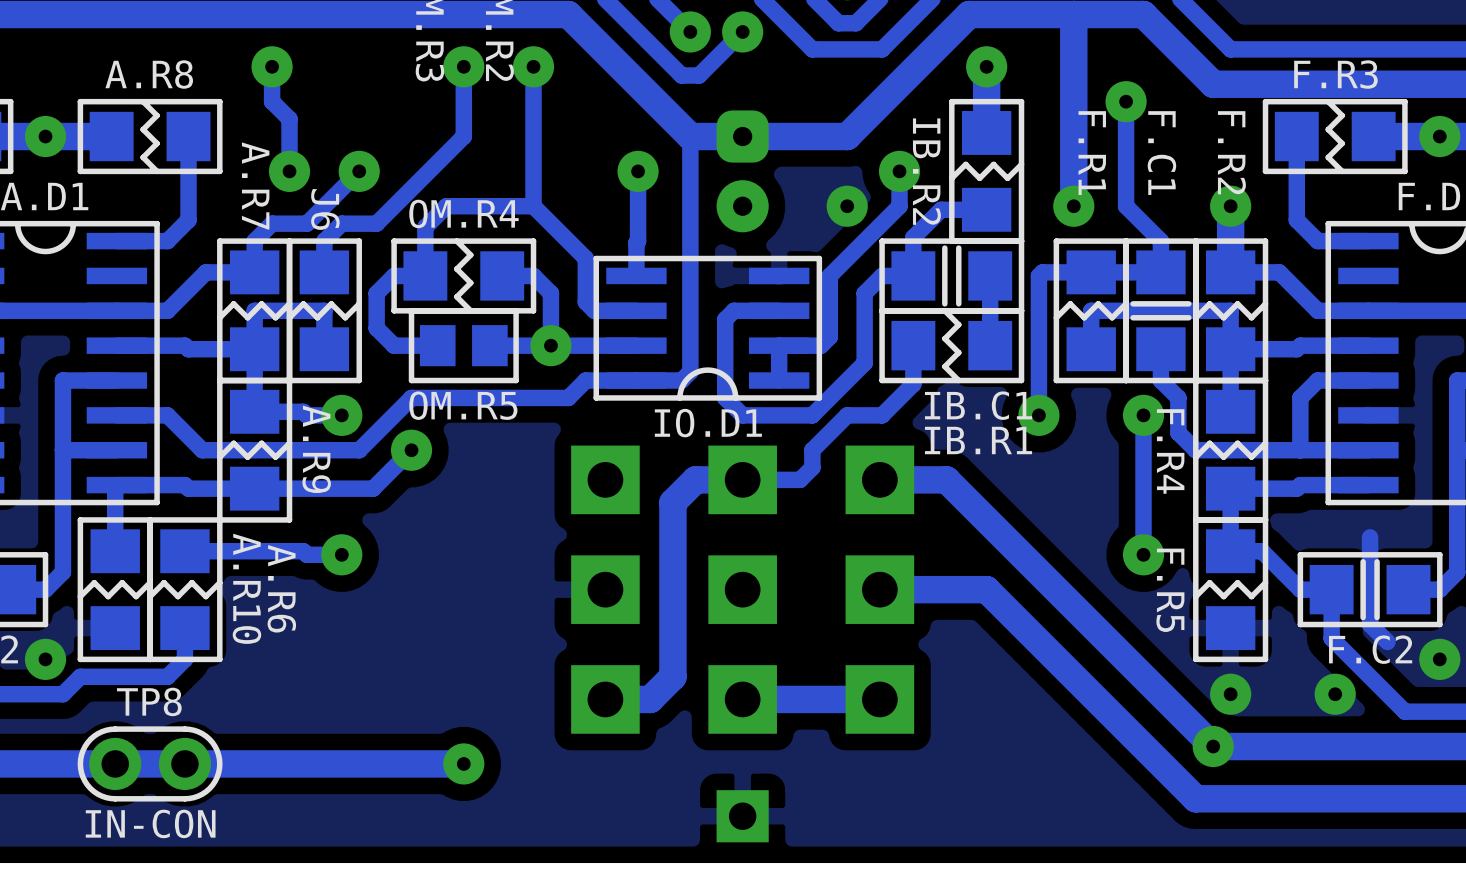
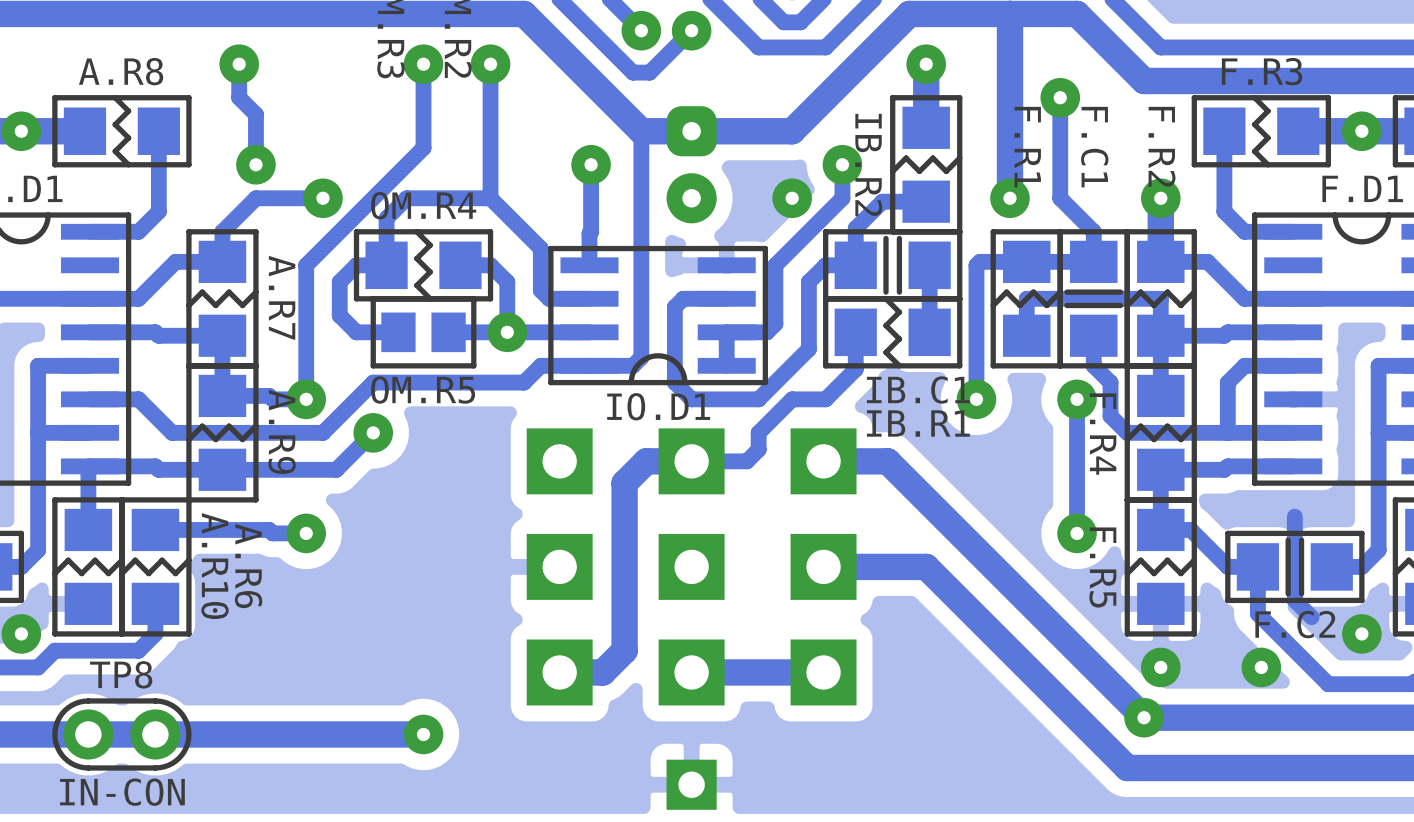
track: (463, 136) (376, 223) (341, 223) (324, 241) (324, 272) -> (423, 131) (423, 148) (306, 265) (306, 399)
track: (359, 171) (306, 223) (272, 223) -> (322, 198) (255, 198) (239, 215)
via position: (359, 171) -> (322, 198)
A.R7 name position: A.R7 (255, 185) -> A.R7 (282, 297)
J6: (324, 310) -> none
track: (324, 349) (324, 310) (254, 310) (254, 349) -> none

